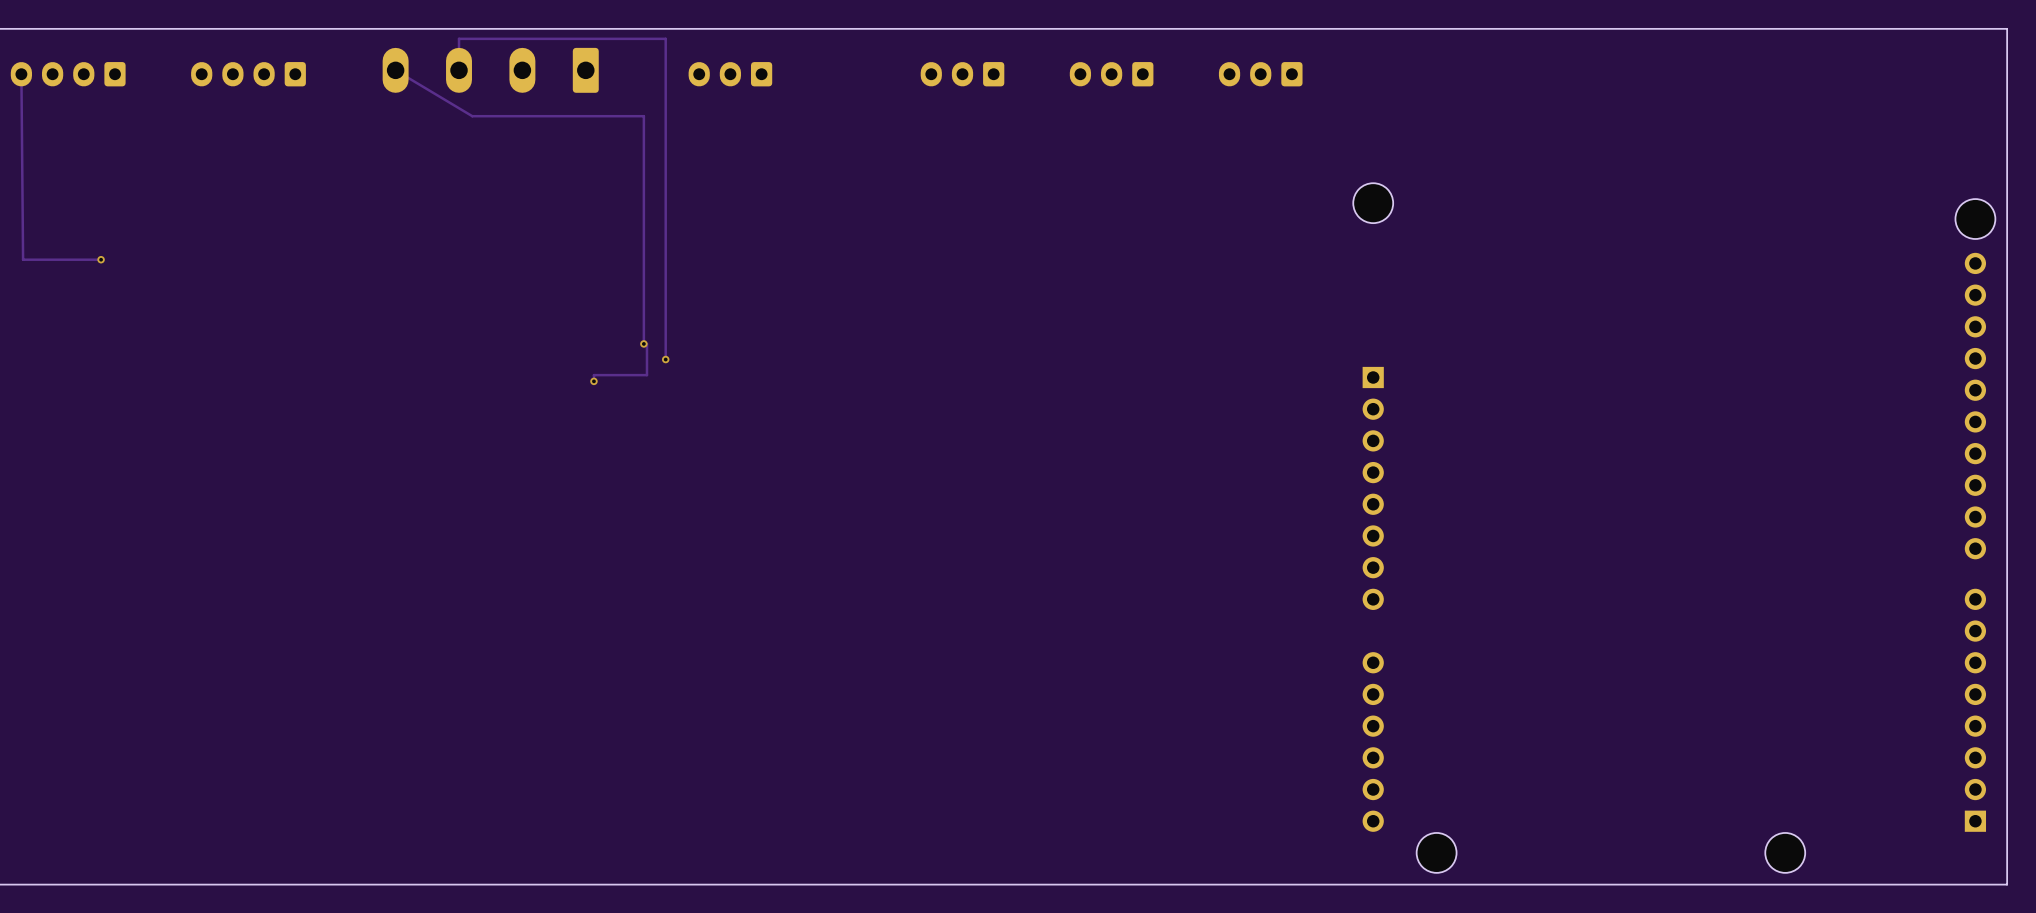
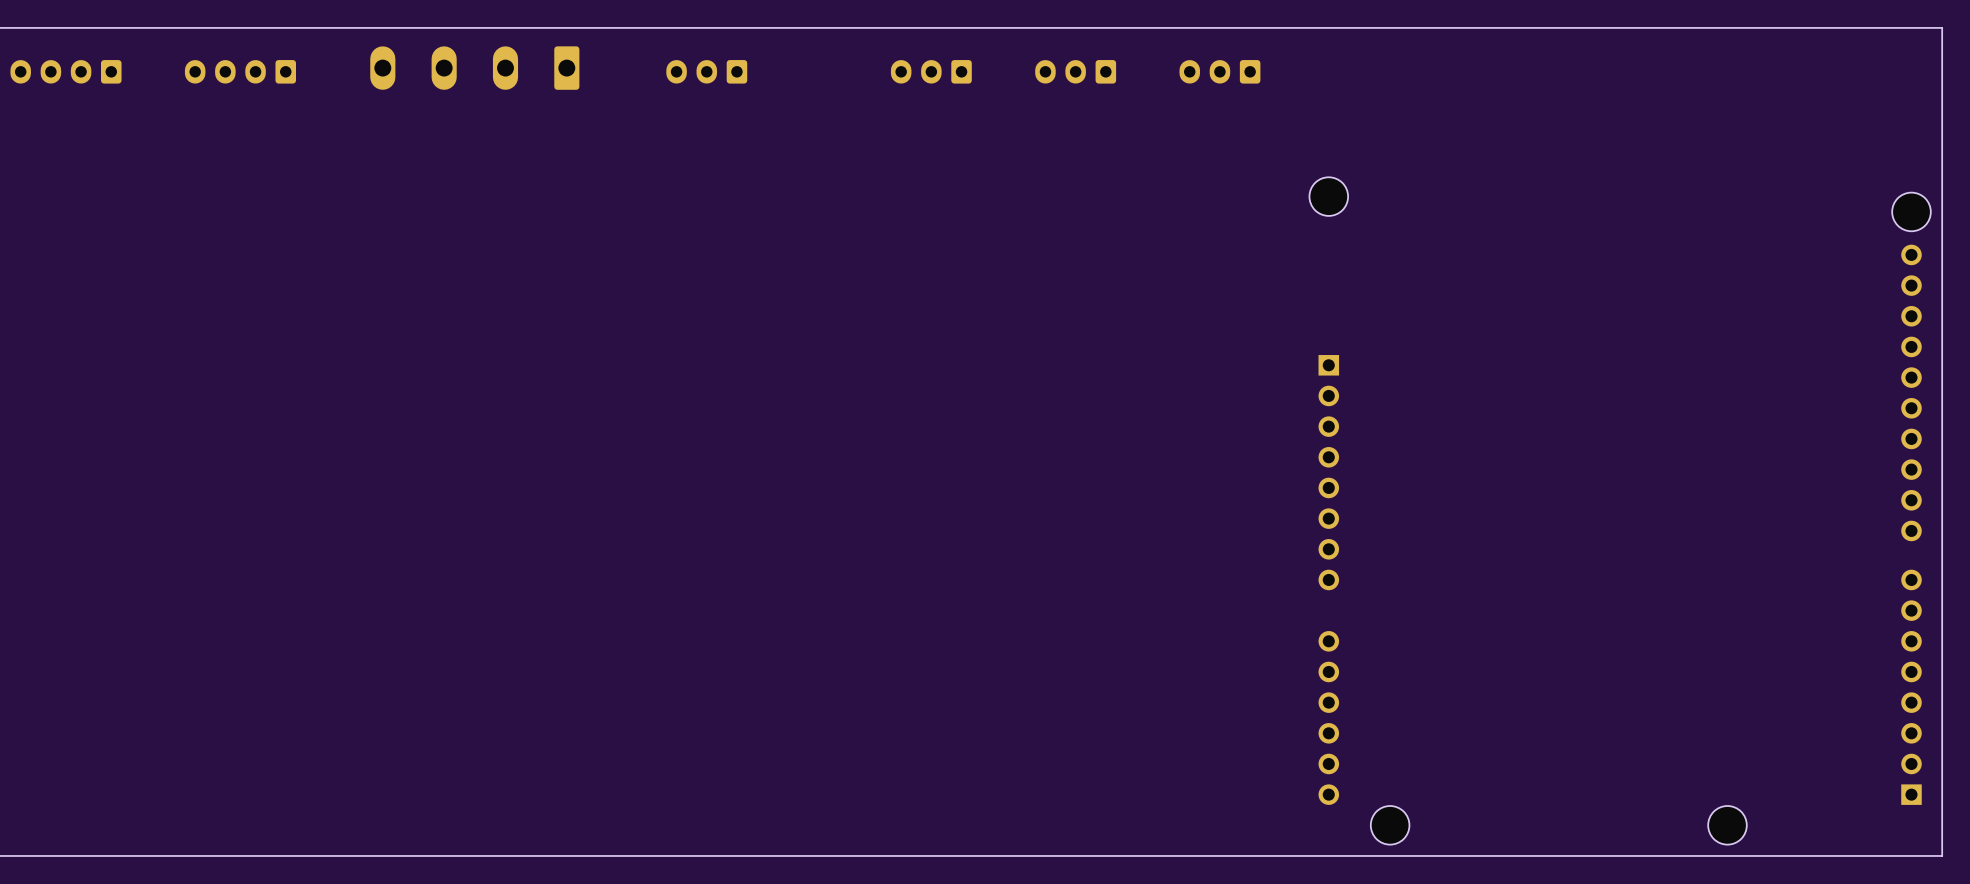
track: (395, 70) (472, 116) (643, 116) (643, 343) (646, 343) (646, 375) (593, 375) (593, 381) -> none
track: (459, 70) (459, 38) (665, 38) (665, 358) -> none
track: (21, 74) (23, 259) (100, 259) -> none
via: (101, 259) -> none
via: (643, 343) -> none
via: (665, 359) -> none
via: (593, 381) -> none

